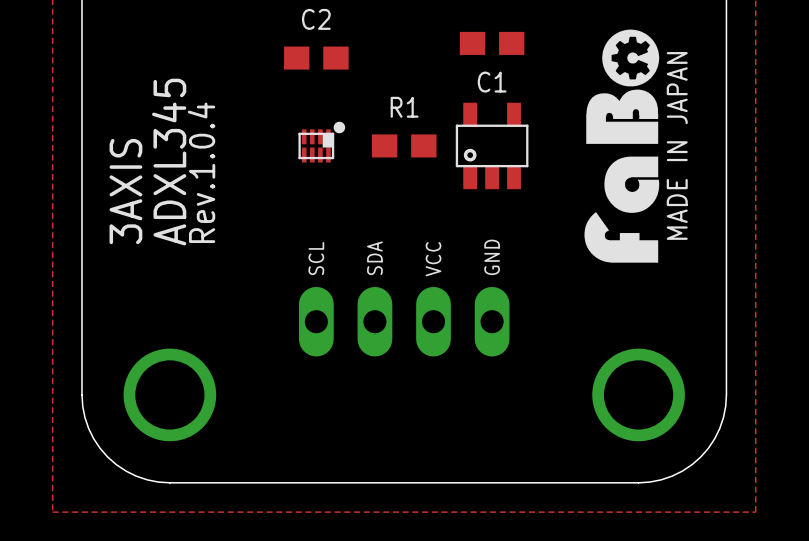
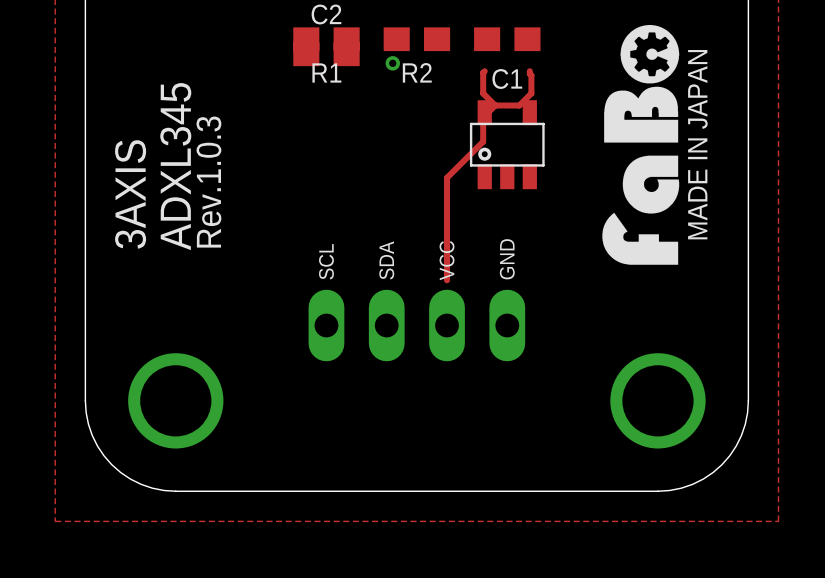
R2: none -> (416, 39)
via: none -> (392, 63)
track: none -> (484, 71) (483, 93) (495, 105)
track: none -> (529, 71) (531, 93) (519, 105) (495, 105)
R1 name position: R1 (404, 107) -> R1 (326, 72)
track: none -> (495, 105) (483, 117) (483, 141) (447, 177) (447, 280)
part: (321, 142) -> none
R1 position: (404, 145) -> (326, 39)
text: Rev.1.0.4 (201, 172) -> Rev.1.0.3 (208, 182)

